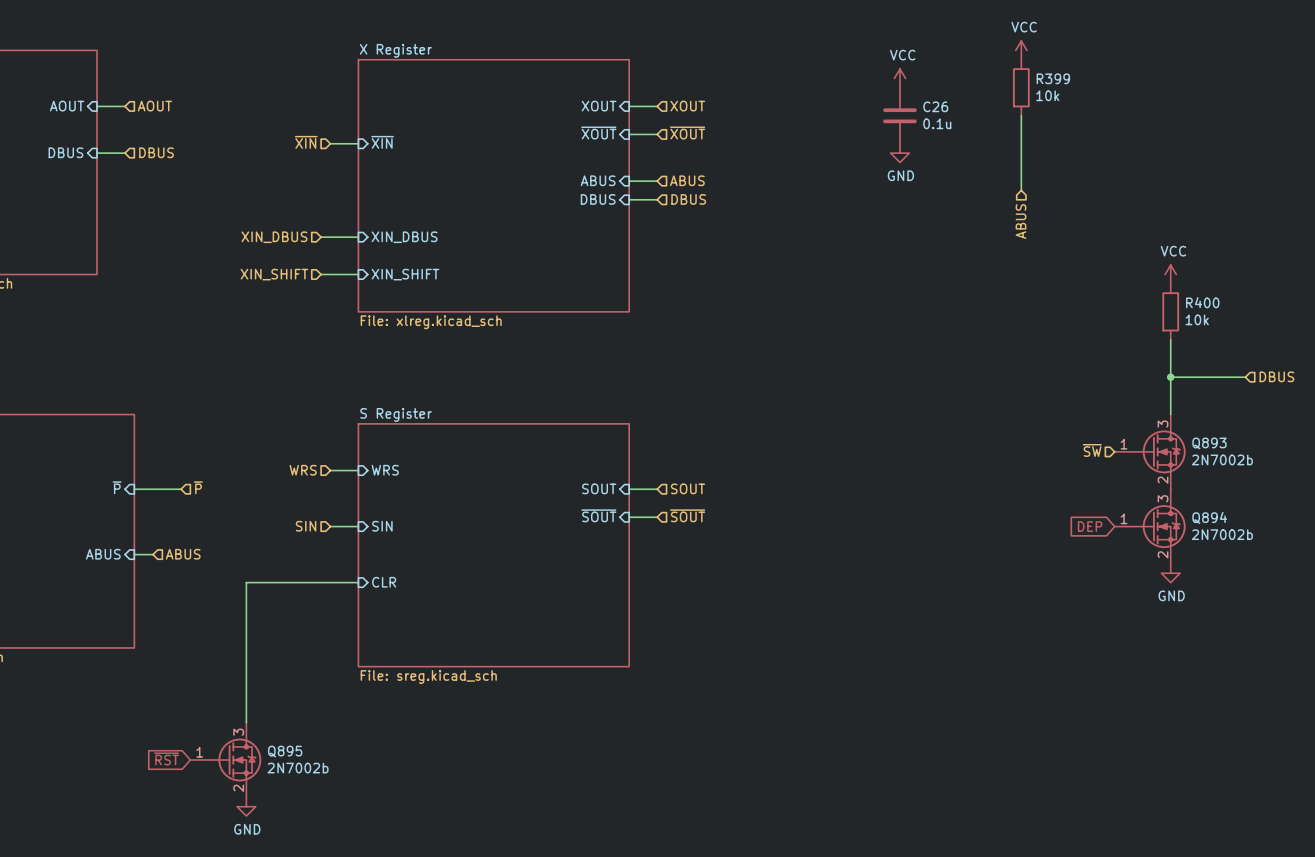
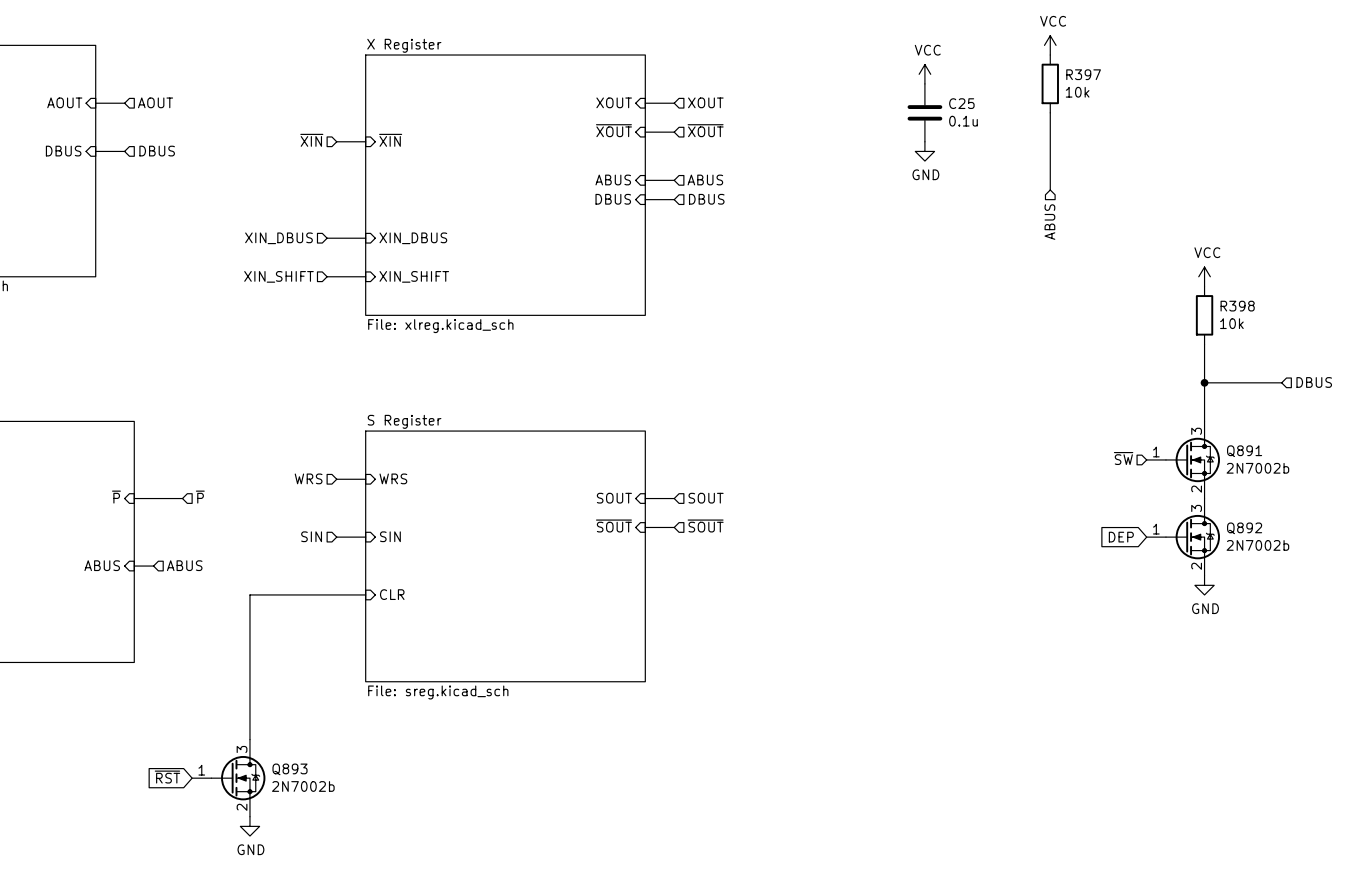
R399 name: R399 (1053, 78) -> R397 (1083, 74)
C26 name: C26 (935, 106) -> C25 (961, 103)
R400 name: R400 (1202, 302) -> R398 (1237, 306)
Q893 name: Q893 (1209, 443) -> Q891 (1244, 451)
Q894 name: Q894 (1209, 517) -> Q892 (1244, 528)
Q895 name: Q895 (285, 751) -> Q893 (290, 769)

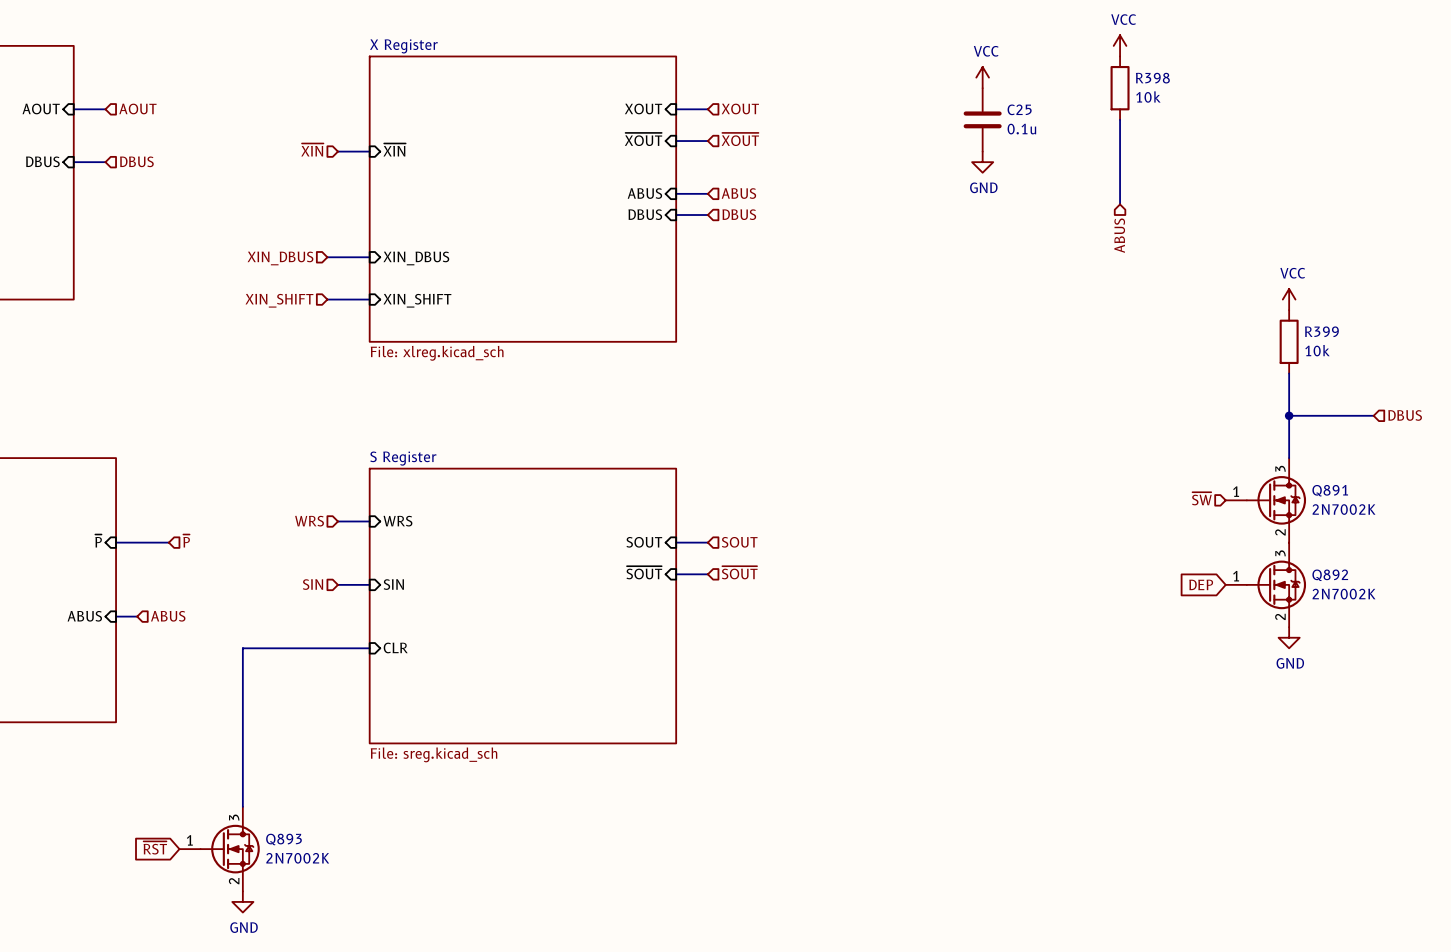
R397 name: R397 (1083, 74) -> R398 (1152, 78)
R398 name: R398 (1237, 306) -> R399 (1321, 331)
Q891 value: 2N7002b (1257, 468) -> 2N7002K (1344, 509)
Q892 value: 2N7002b (1257, 545) -> 2N7002K (1344, 594)
Q893 value: 2N7002b (303, 786) -> 2N7002K (297, 858)

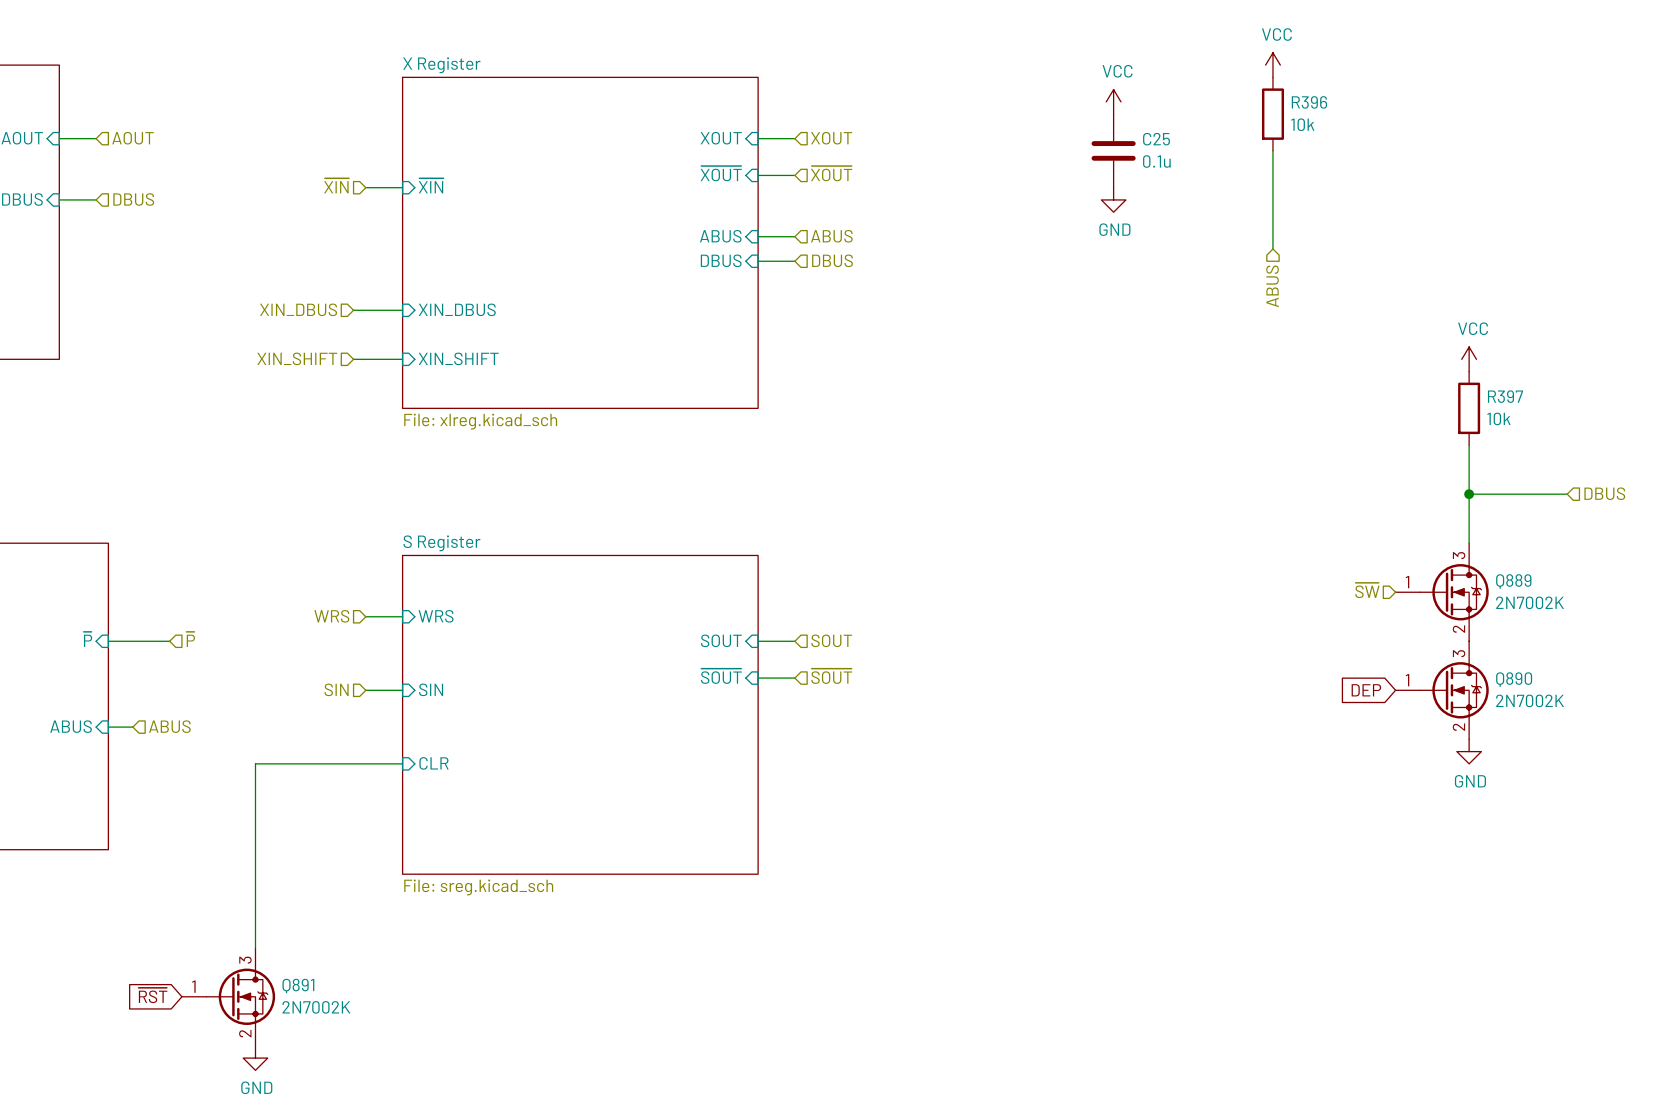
R398 name: R398 (1152, 78) -> R396 (1309, 102)
R399 name: R399 (1321, 331) -> R397 (1505, 396)
Q891 name: Q891 (1330, 490) -> Q889 (1513, 581)
Q892 name: Q892 (1330, 575) -> Q890 (1514, 679)
Q893 name: Q893 (283, 839) -> Q891 (298, 985)

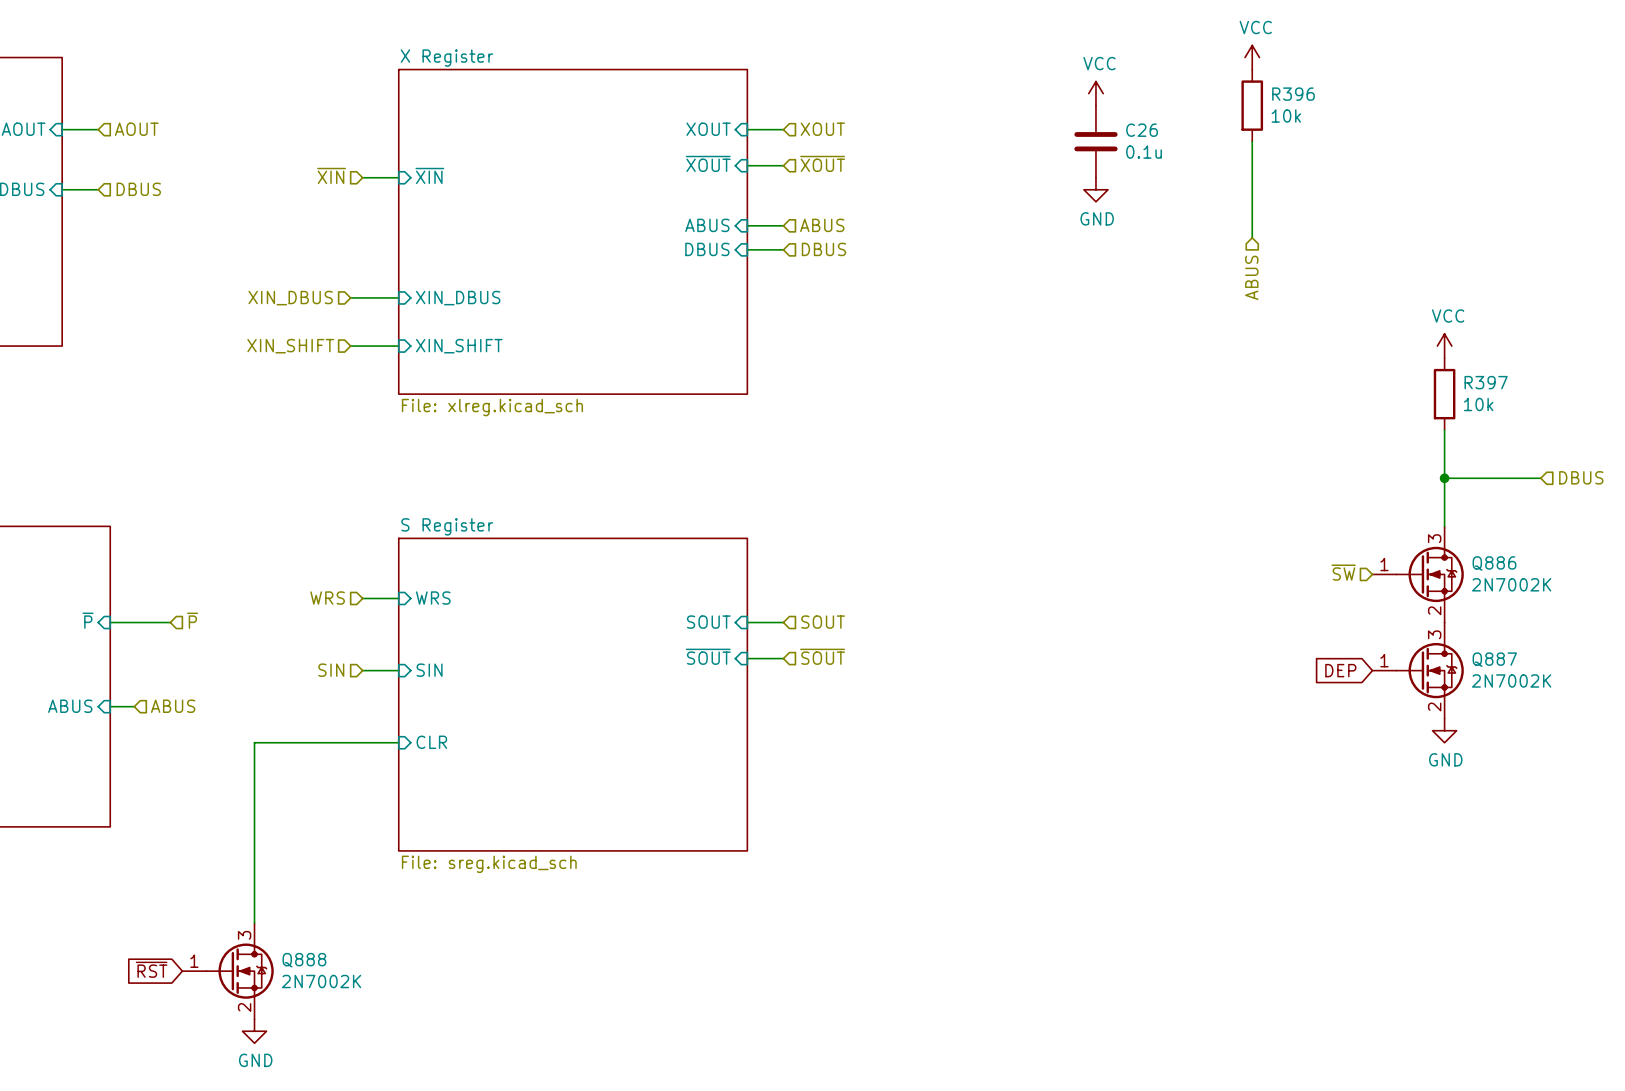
C25 name: C25 (1156, 139) -> C26 (1142, 130)
Q889 name: Q889 (1513, 581) -> Q886 (1494, 563)
Q890 name: Q890 (1514, 679) -> Q887 (1494, 659)
Q891 name: Q891 (298, 985) -> Q888 (304, 960)

